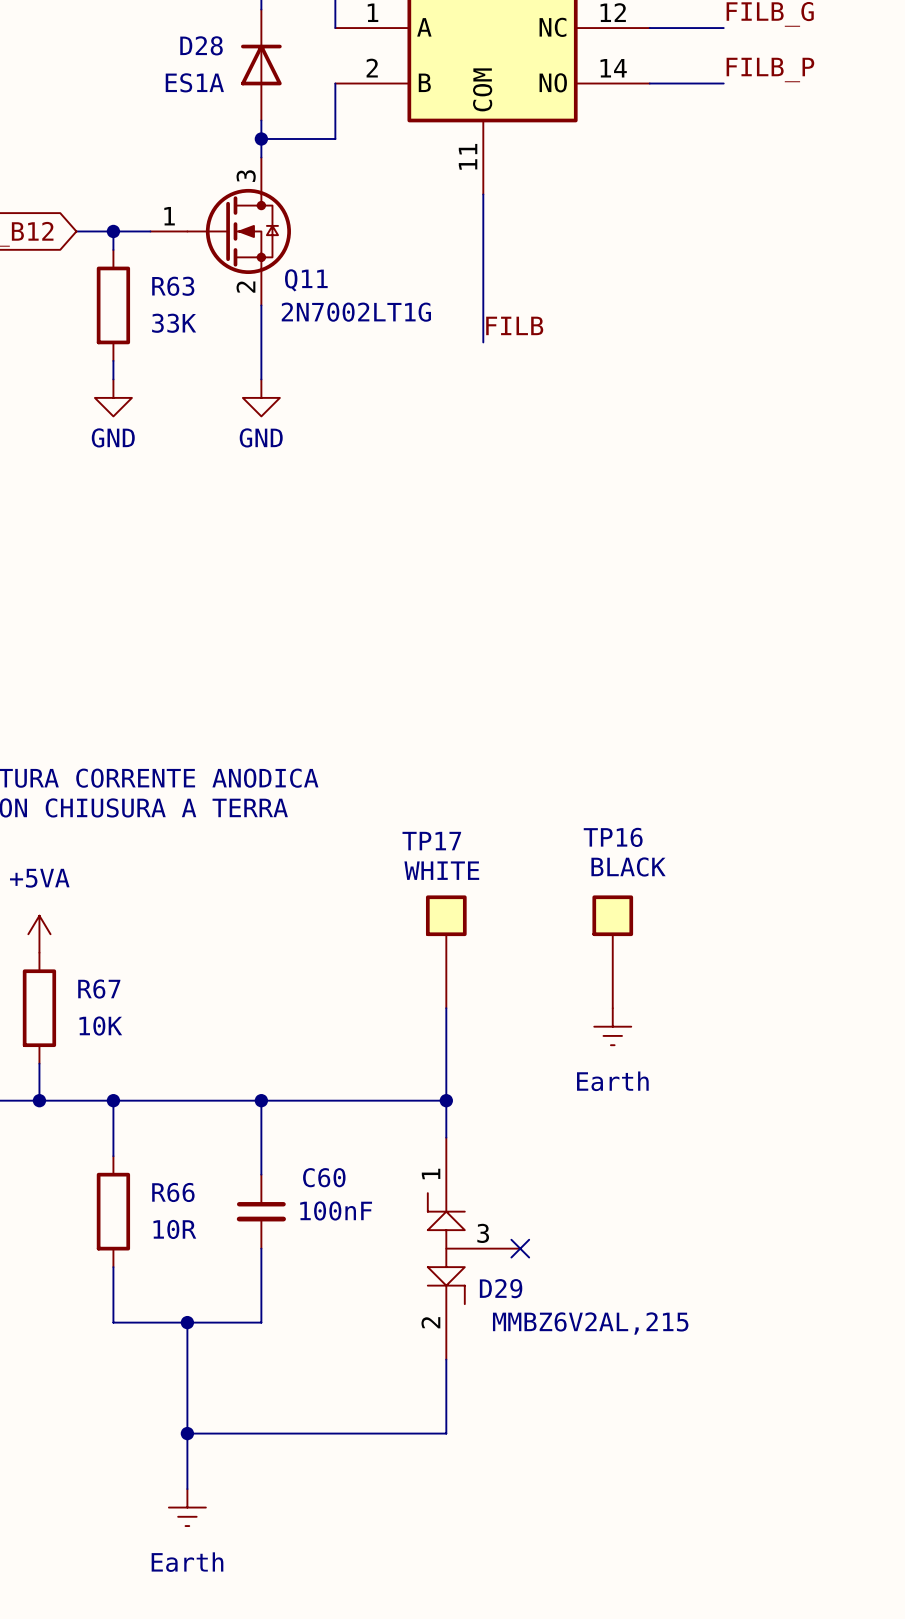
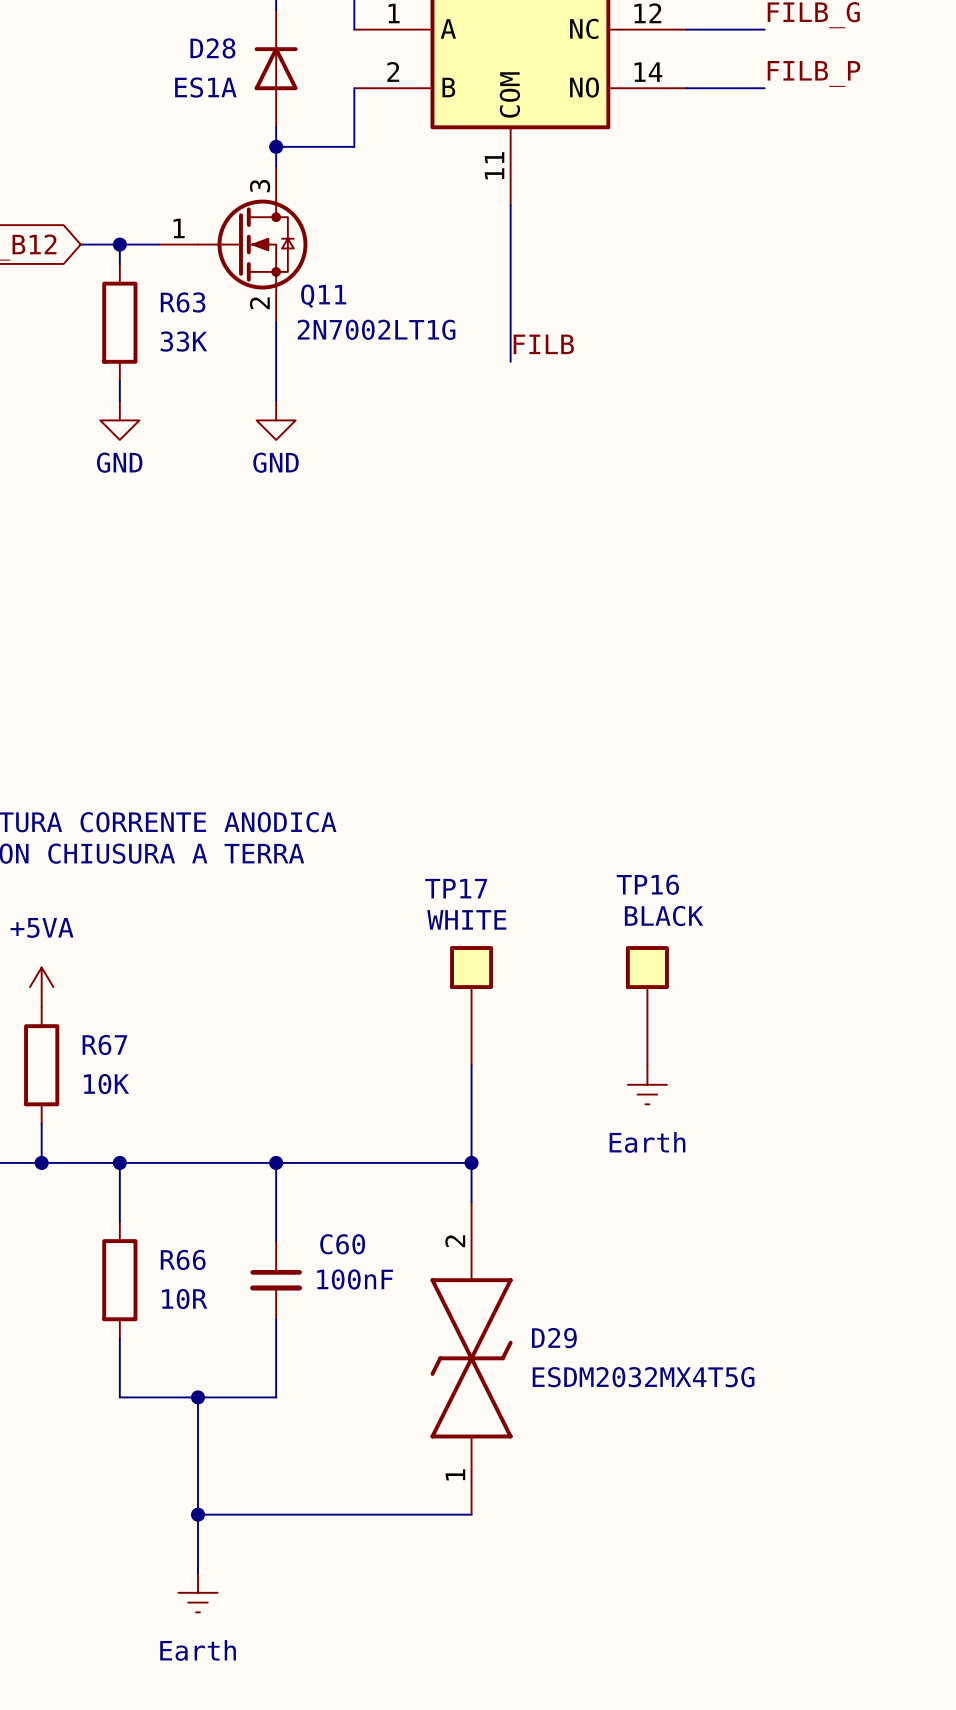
D29 symbol: [427, 1137, 521, 1360] -> [430, 1202, 513, 1515]
no-connect mark: (520, 1248) -> none
D29 name position: D29 (501, 1288) -> D29 (554, 1338)
D29 value: MMBZ6V2AL,215 (590, 1323) -> ESDM2032MX4T5G (643, 1377)

